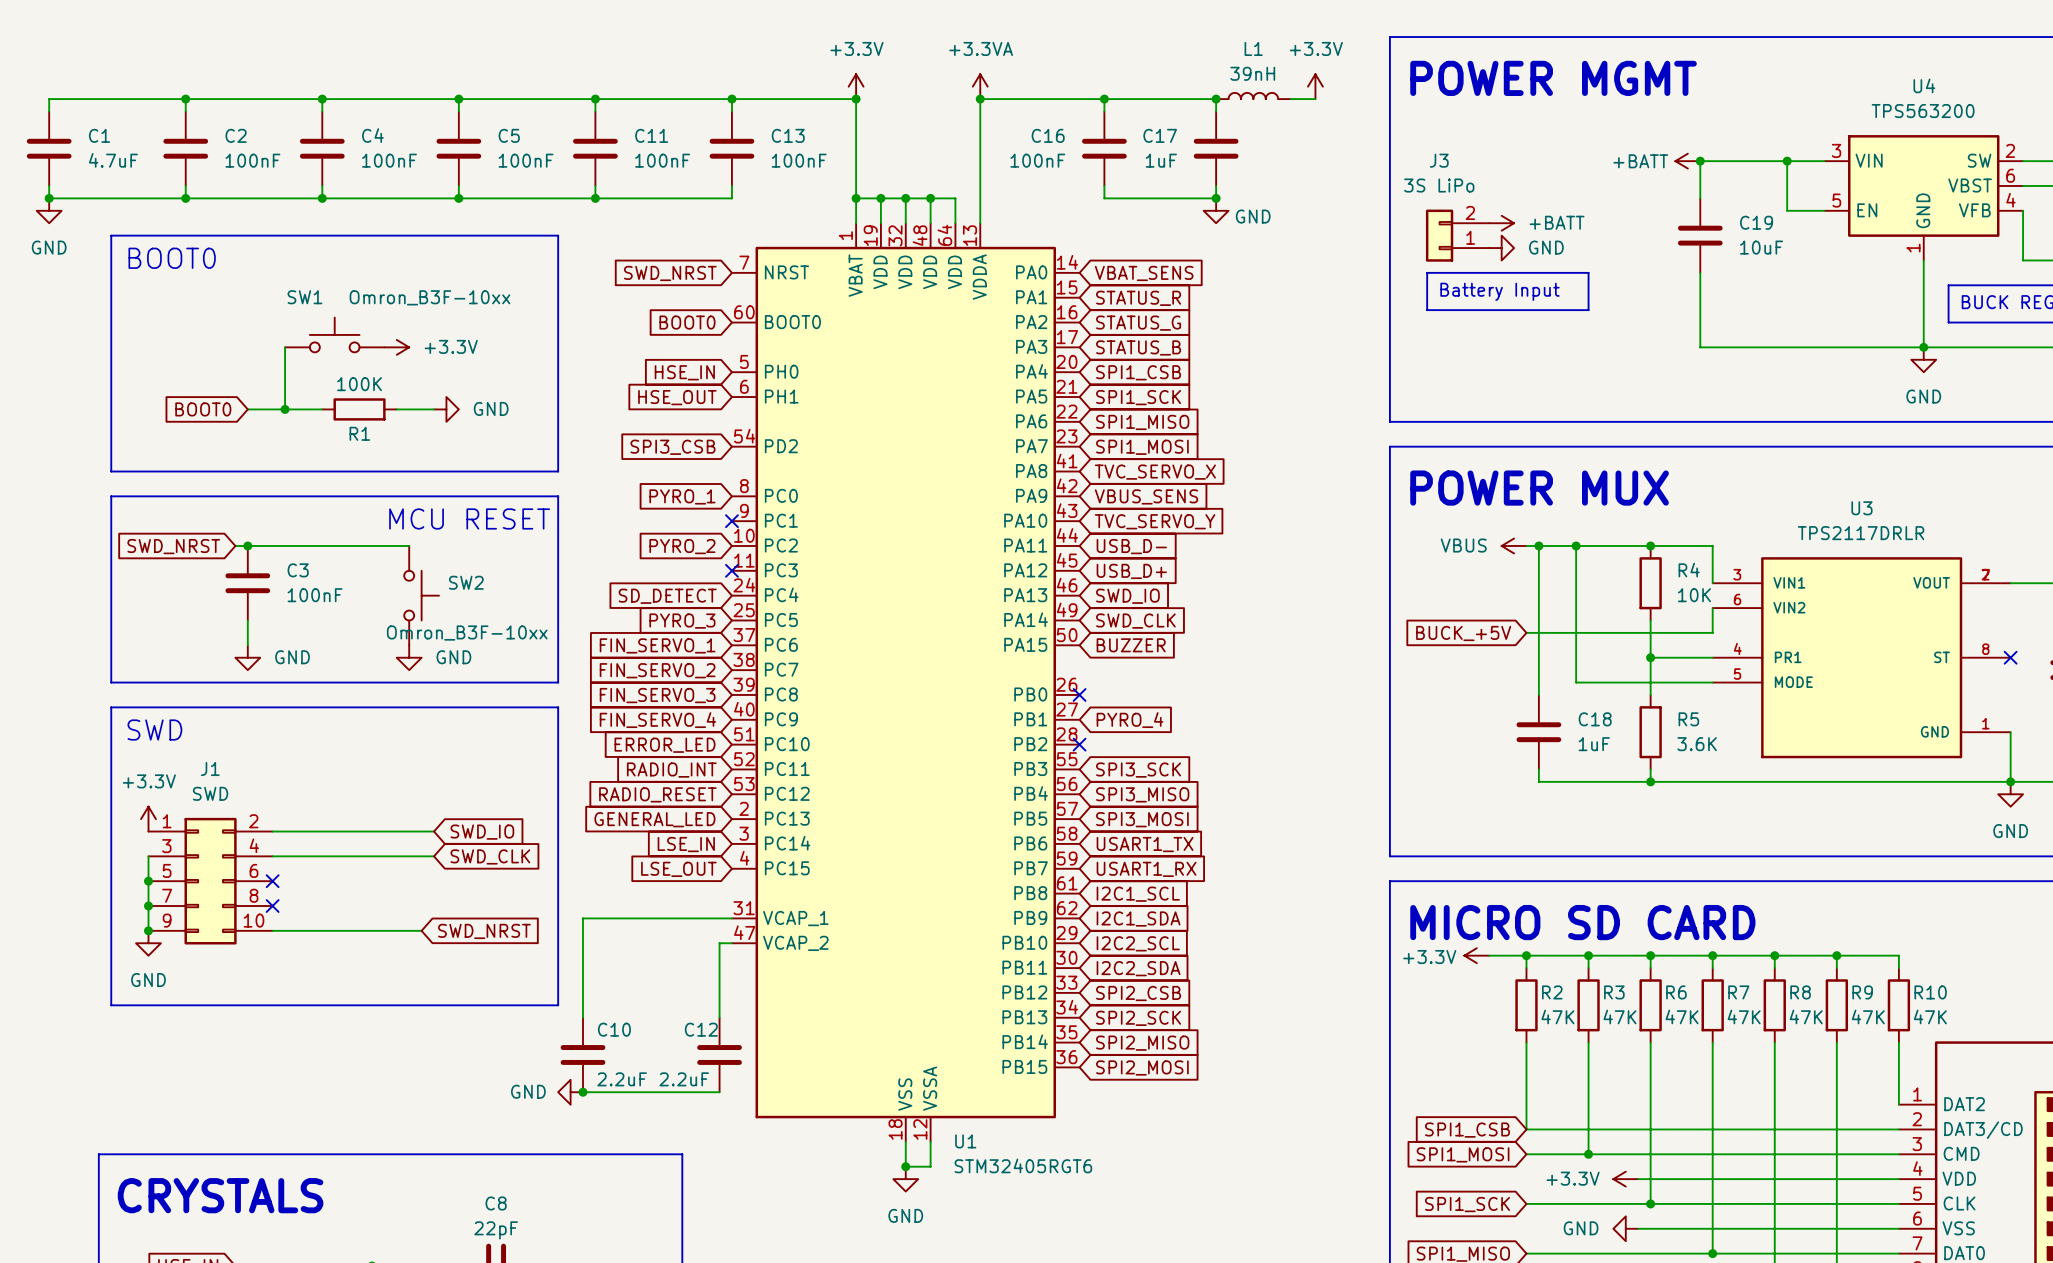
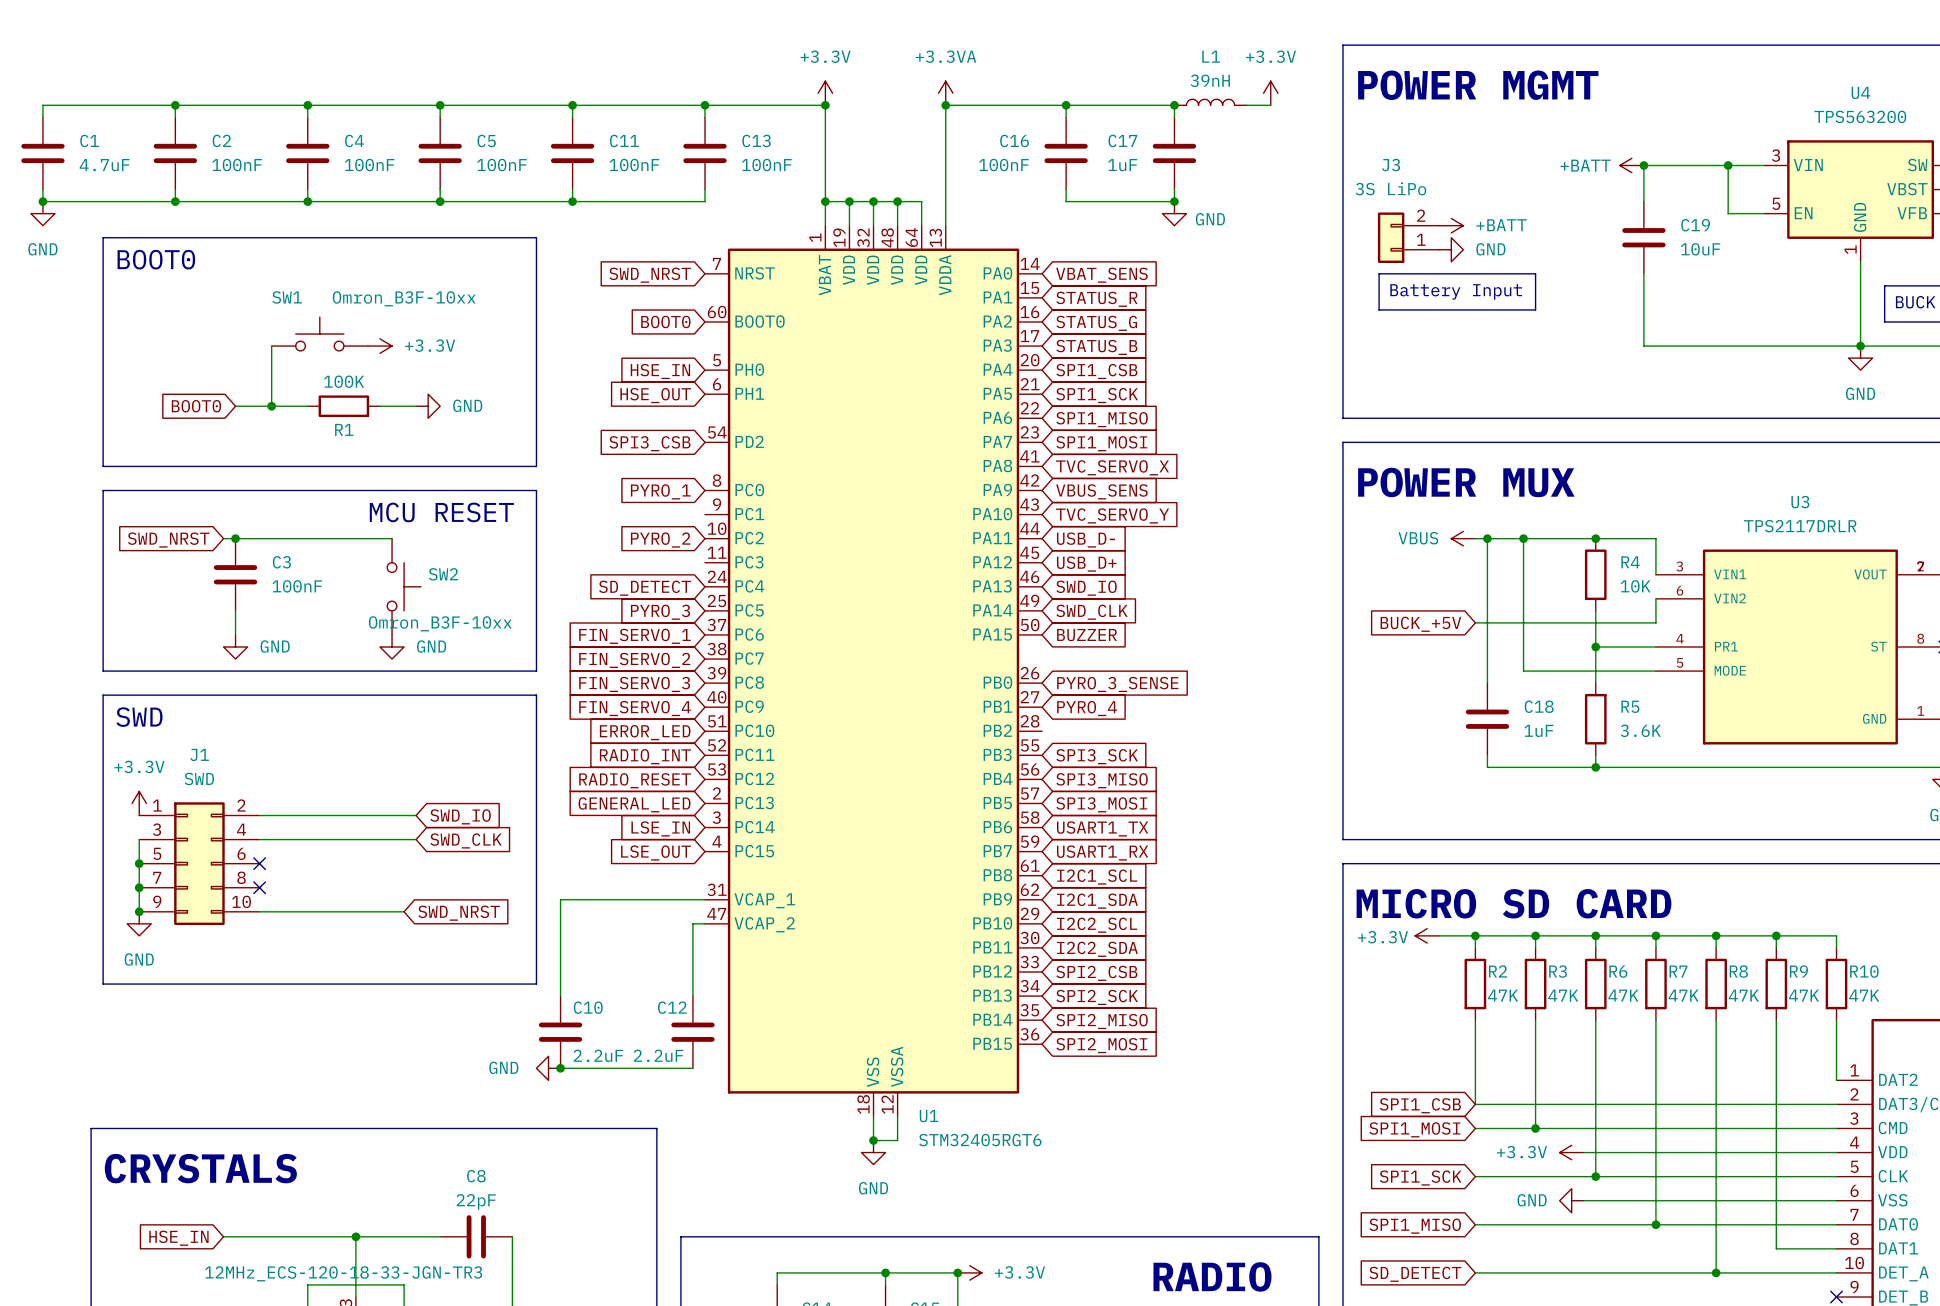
no-connect mark: (731, 521) -> none
no-connect mark: (731, 570) -> none
no-connect mark: (1079, 694) -> none
global label: none -> PYRO_3_SENSE (1117, 684)
no-connect mark: (1079, 744) -> none

